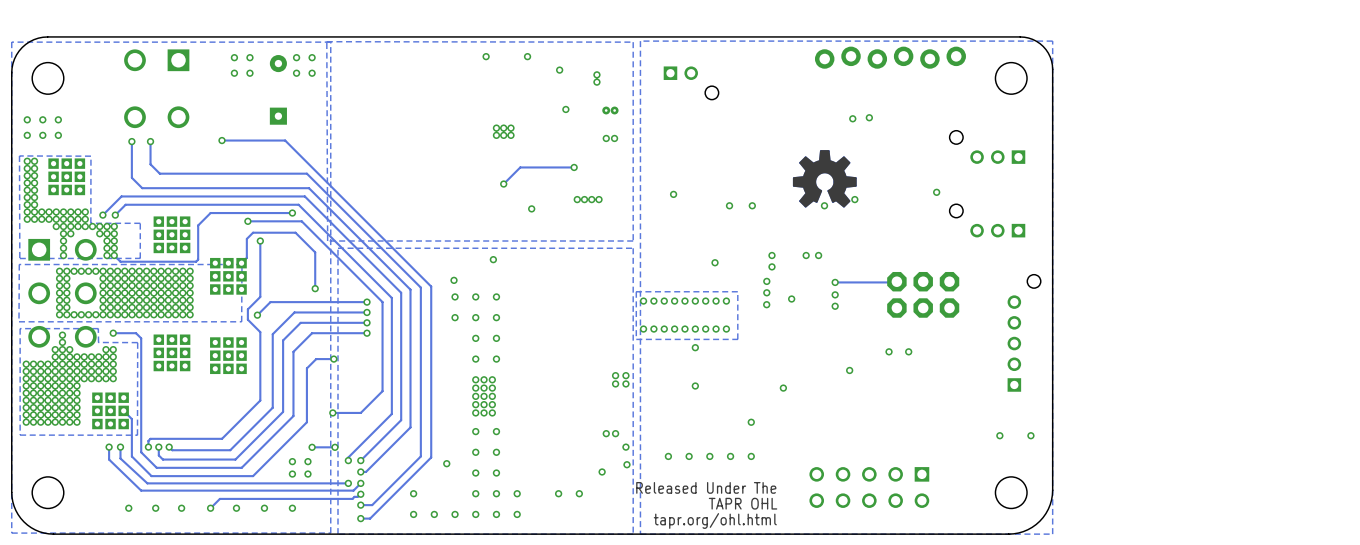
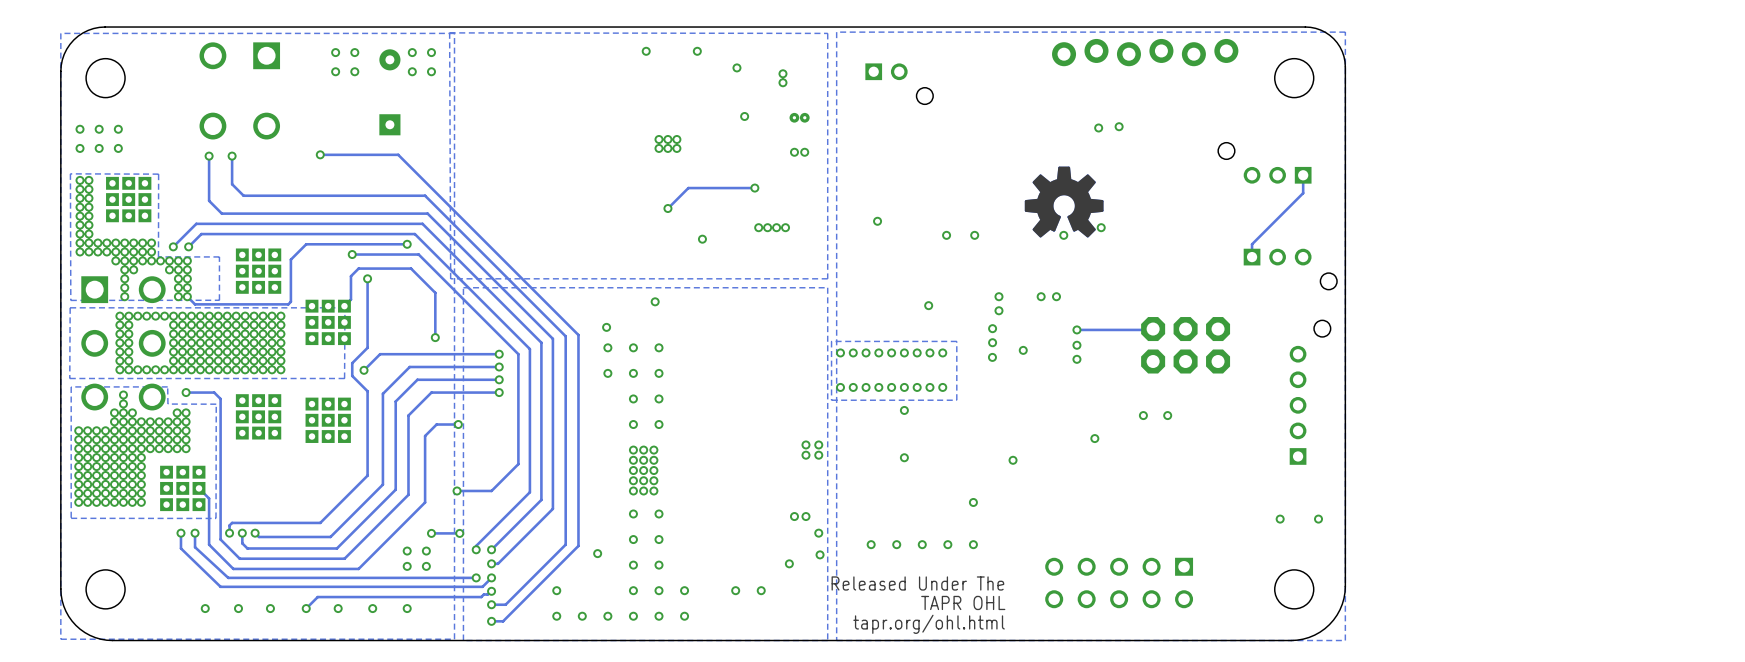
track: none -> (1303, 175) (1303, 193) (1252, 244) (1252, 257)
via: (936, 192) -> none
part rotation: 0° (987, 220) -> 180° (1290, 269)

